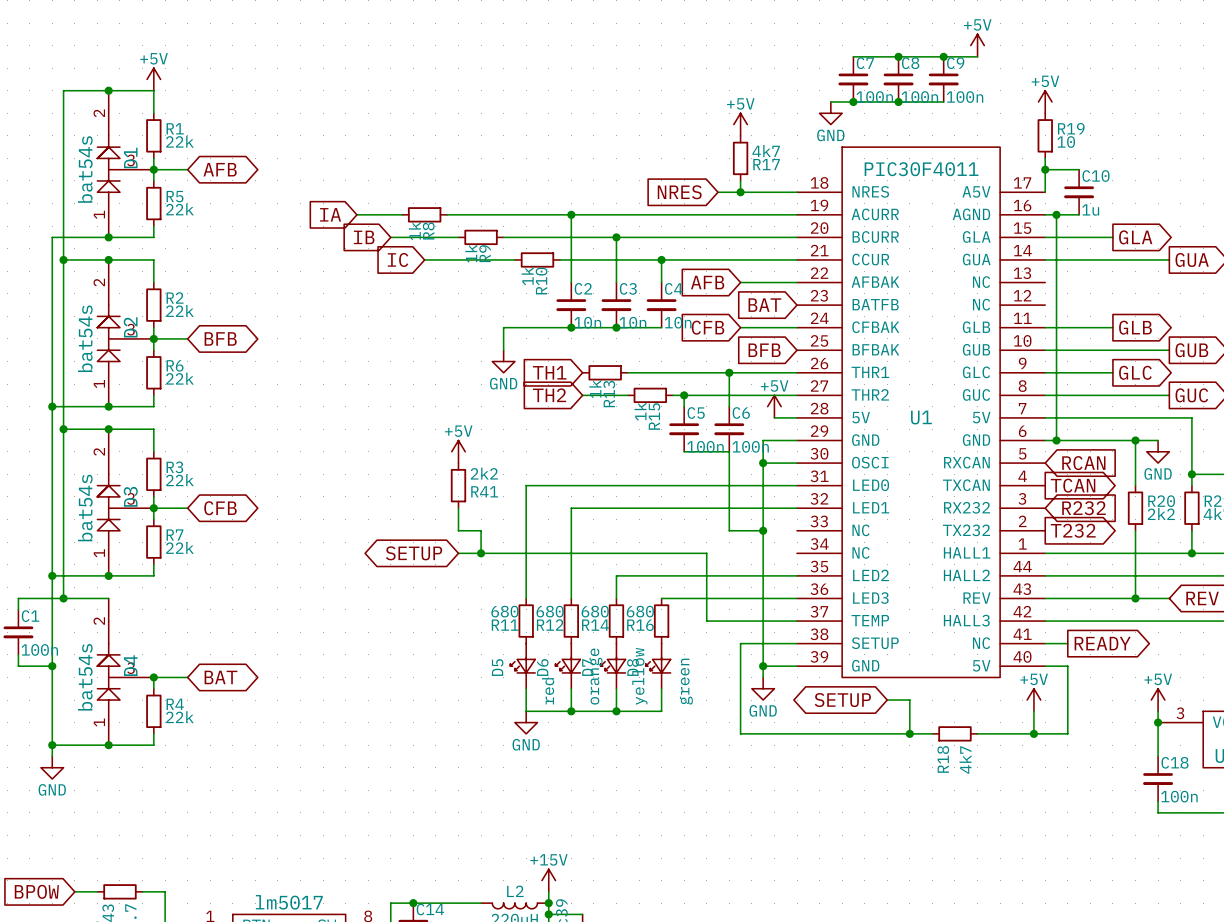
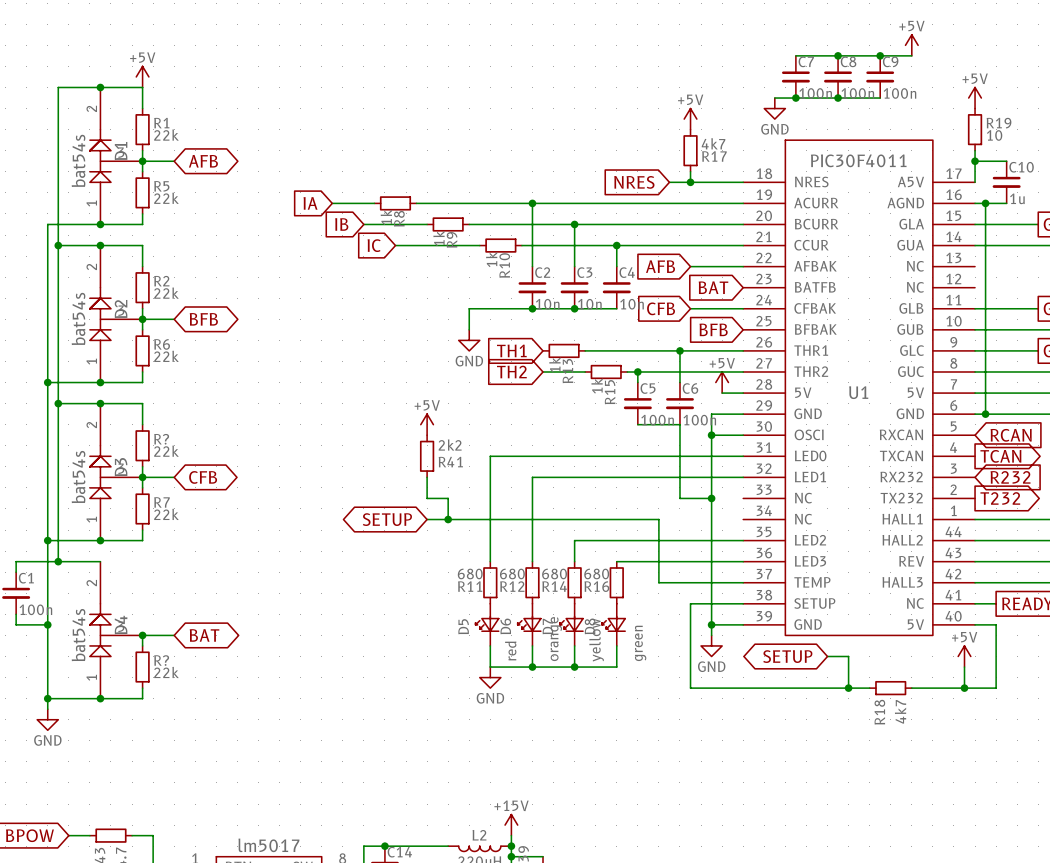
R3 name: R3 (174, 467) -> R? (161, 439)
R4 name: R4 (175, 704) -> R? (161, 660)

